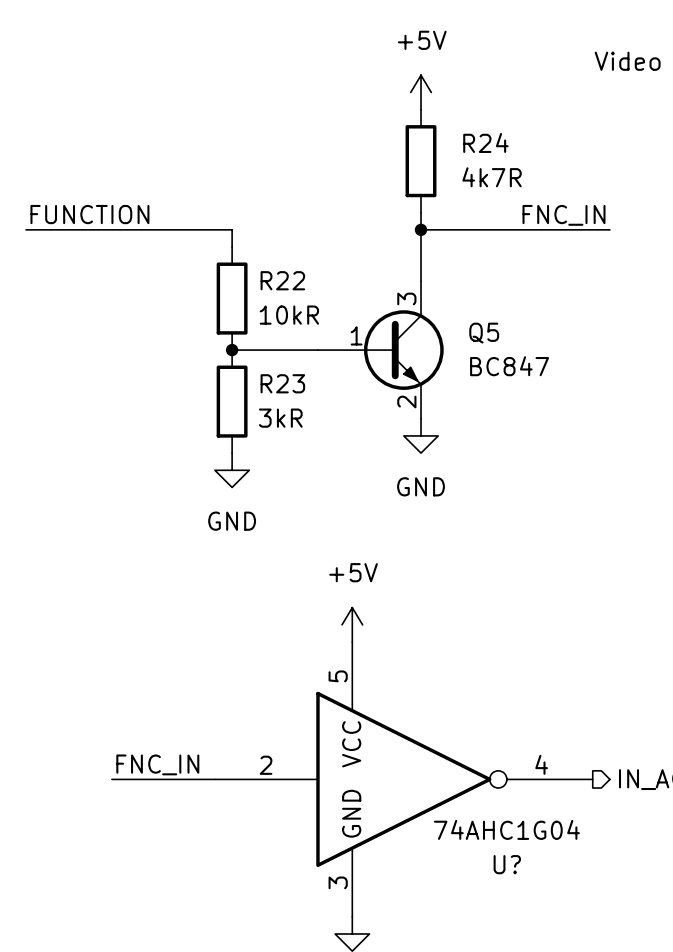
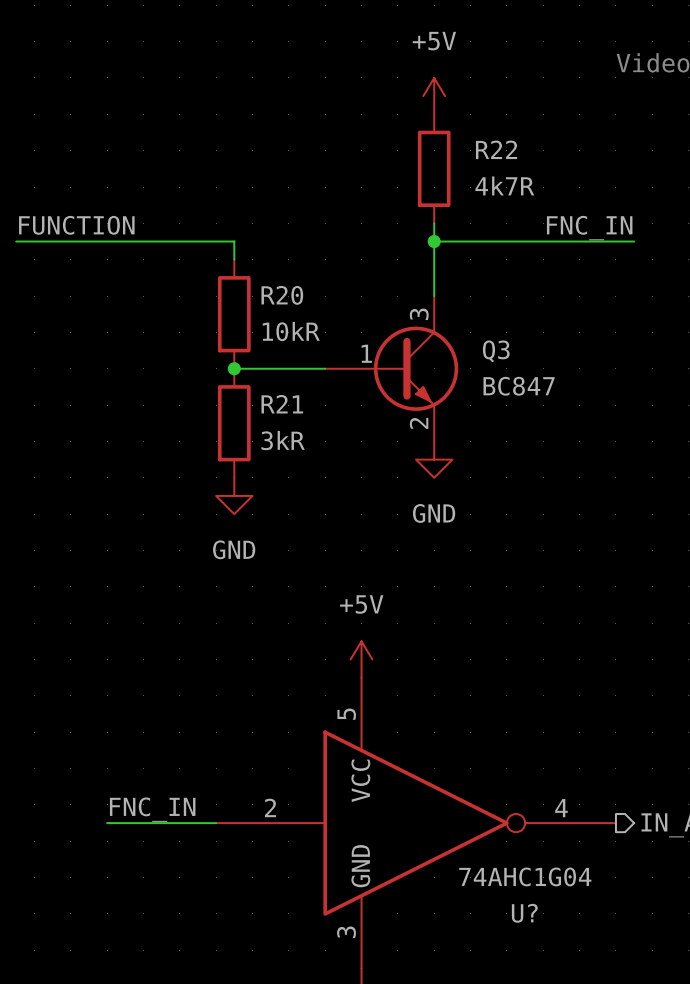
R24 name: R24 (485, 142) -> R22 (496, 149)
R22 name: R22 (282, 280) -> R20 (282, 295)
Q5 name: Q5 (484, 333) -> Q3 (496, 351)
R23 name: R23 (282, 383) -> R21 (282, 404)

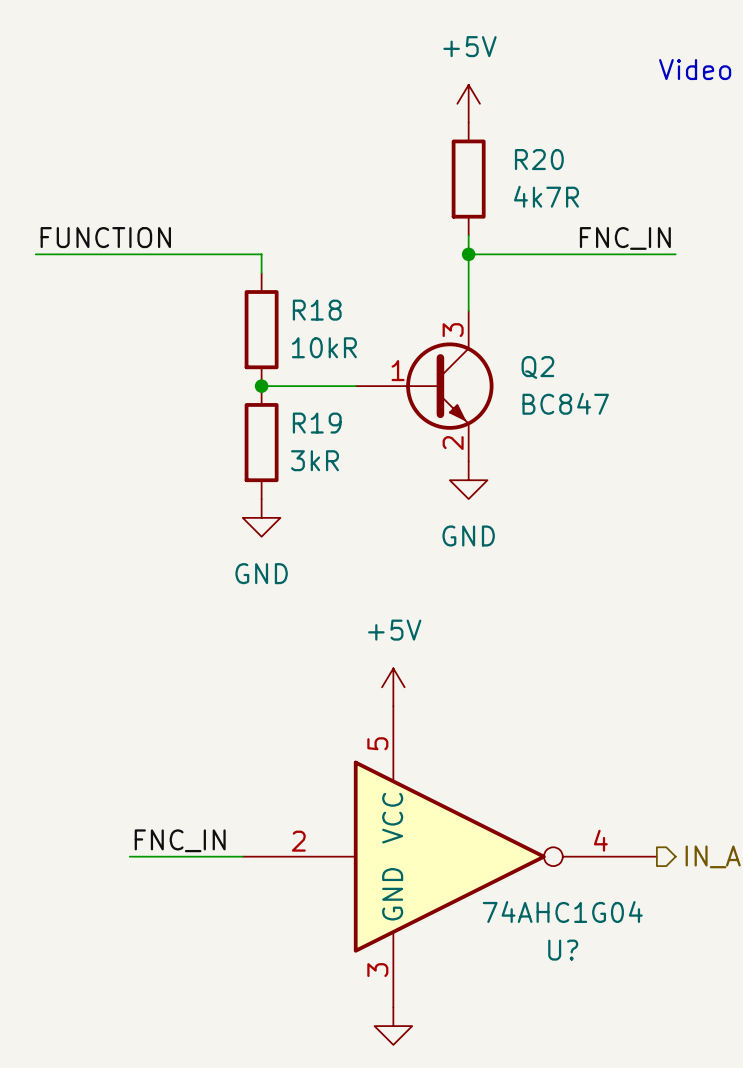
R22 name: R22 (496, 149) -> R20 (539, 159)
R20 name: R20 (282, 295) -> R18 (317, 310)
Q3 name: Q3 (496, 351) -> Q2 (537, 367)
R21 name: R21 (282, 404) -> R19 (317, 423)

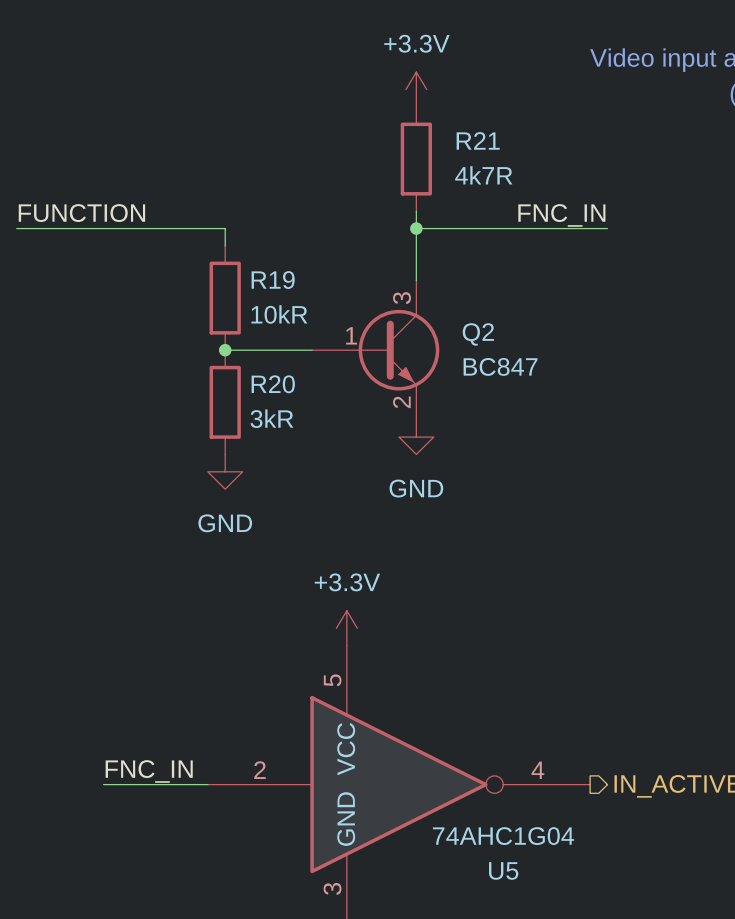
power symbol: +5V (468, 103) -> +3.3V (416, 89)
R20 name: R20 (539, 159) -> R21 (478, 140)
R18 name: R18 (317, 310) -> R19 (273, 280)
R19 name: R19 (317, 423) -> R20 (273, 384)
power symbol: +5V (393, 687) -> +3.3V (346, 628)
U? name: U? (563, 950) -> U5 (503, 870)

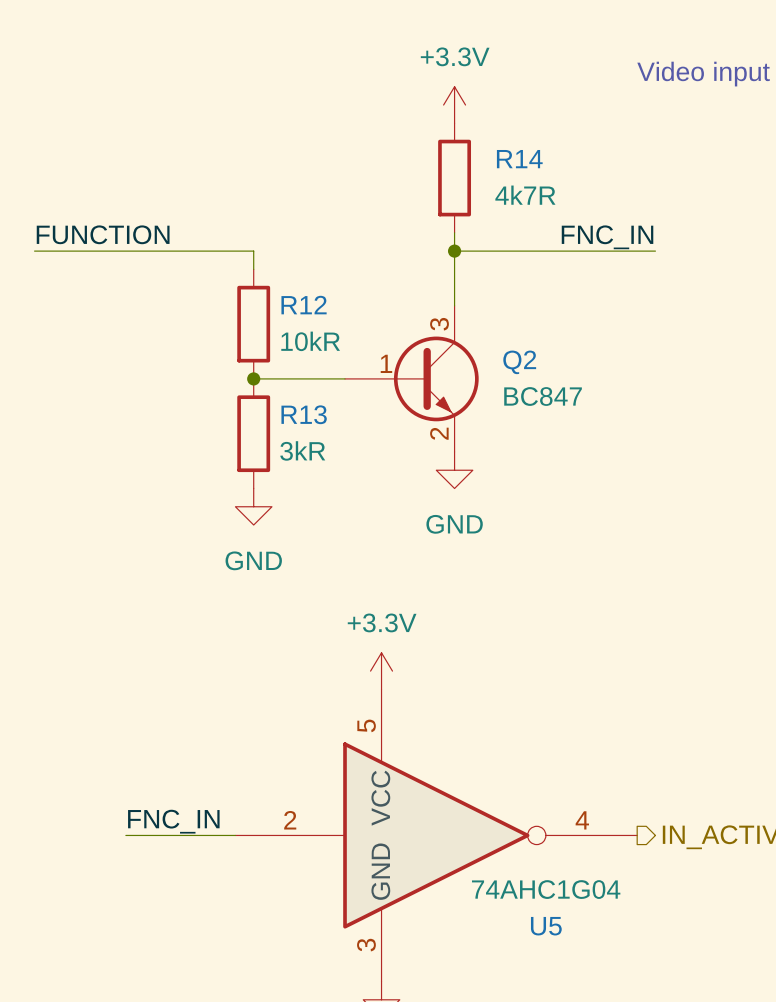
R21 name: R21 (478, 140) -> R14 (519, 159)
R19 name: R19 (273, 280) -> R12 (304, 305)
R20 name: R20 (273, 384) -> R13 (304, 414)

